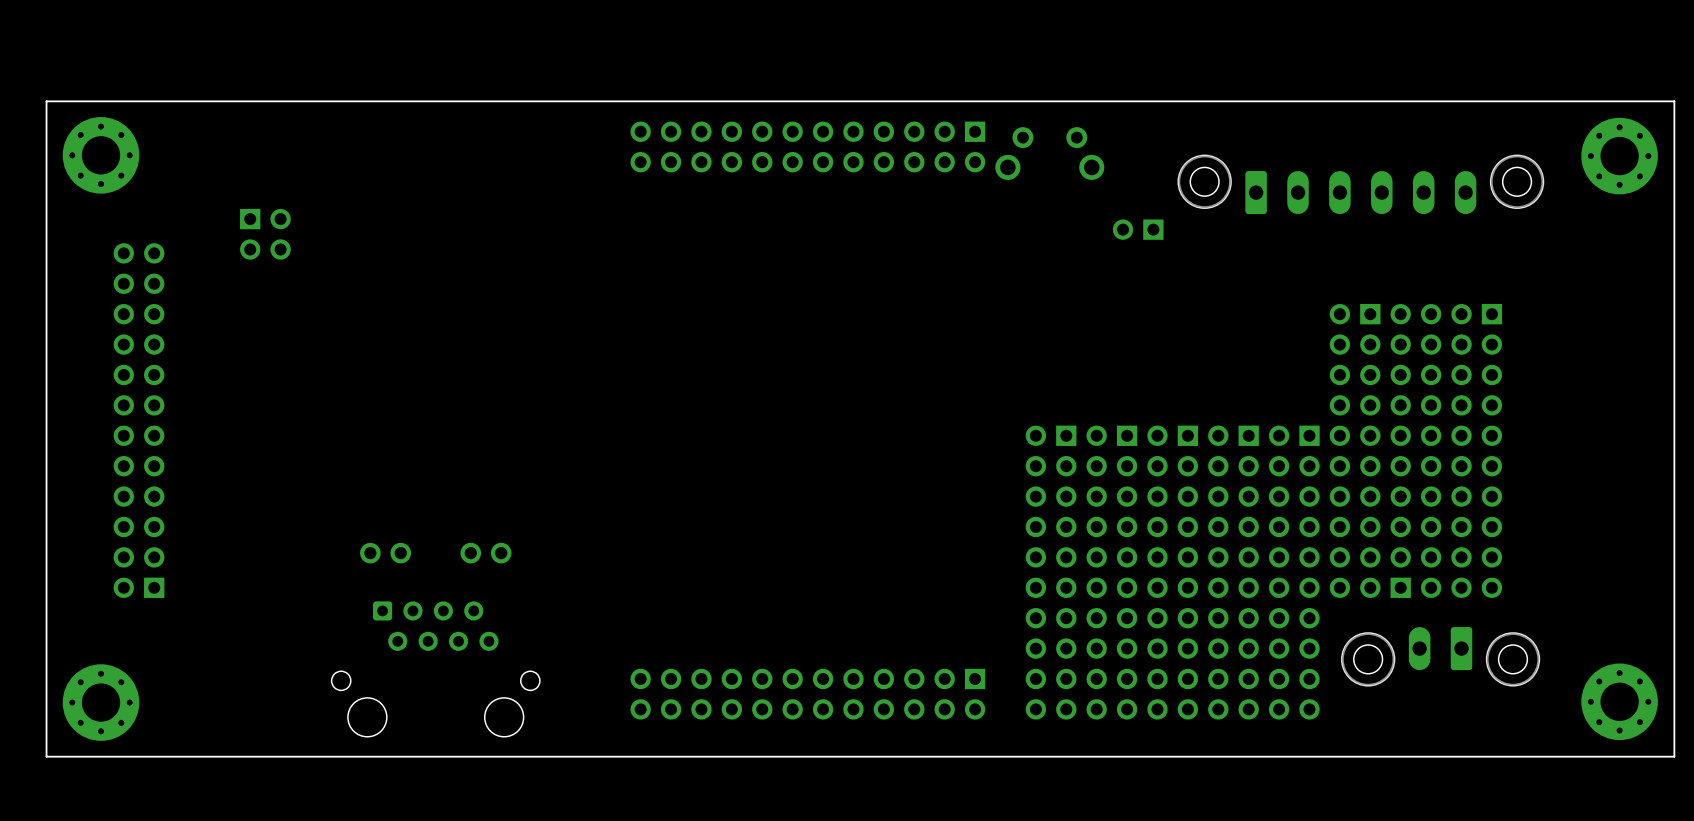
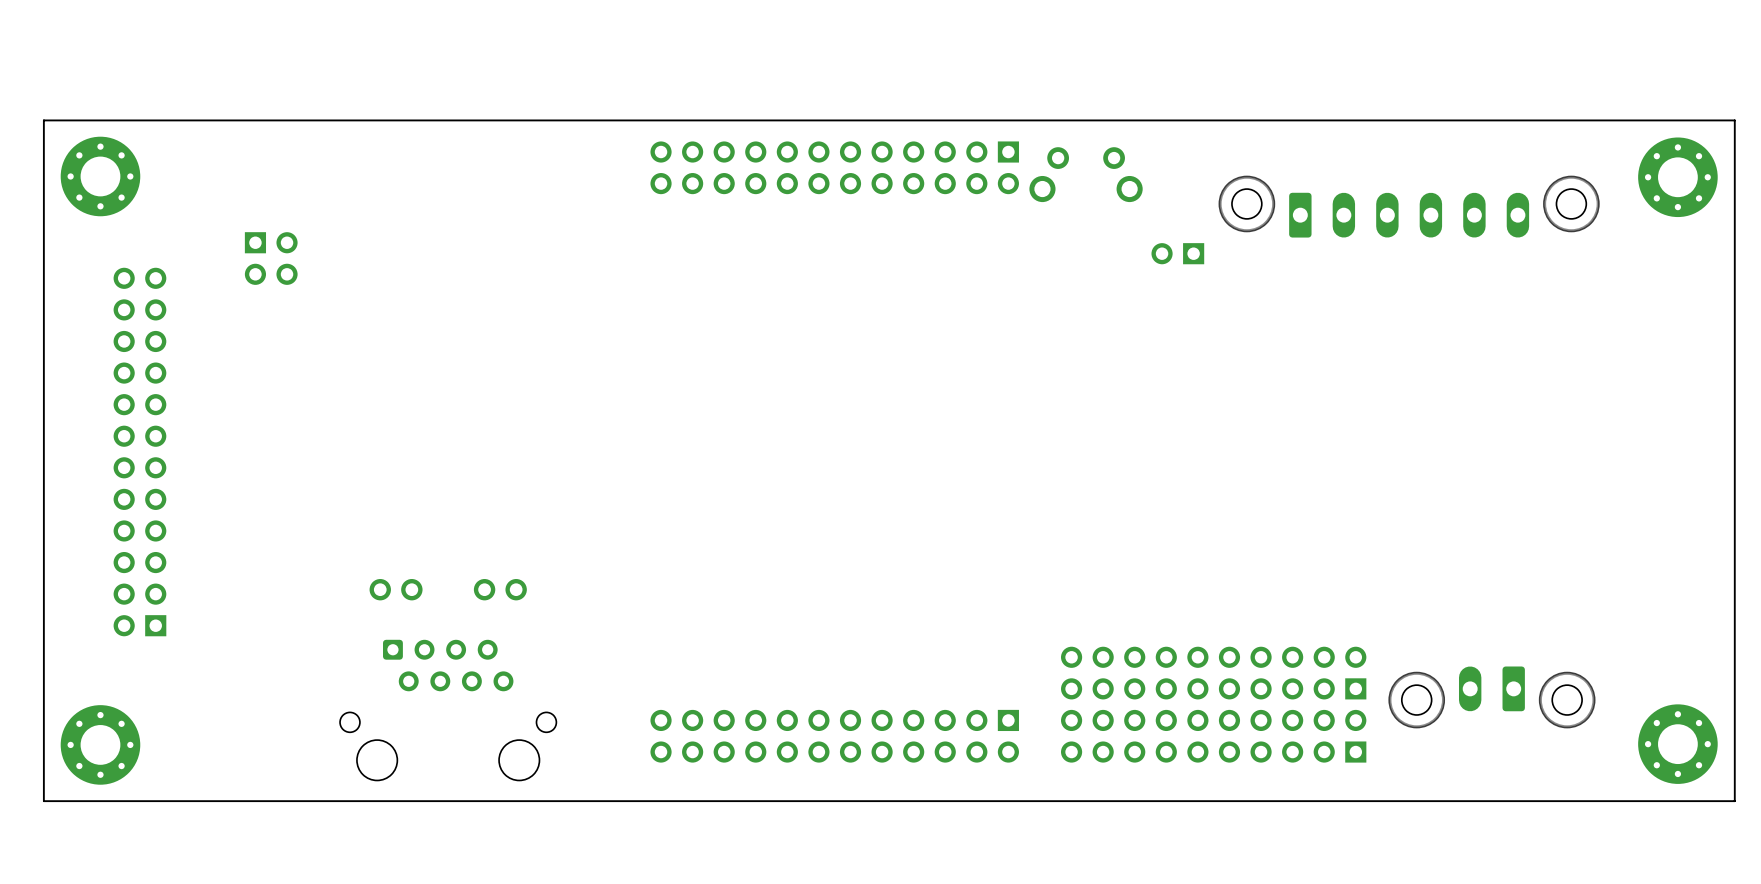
part: (1355, 450) -> none
part: (1415, 450) -> none
part: (1476, 450) -> none
part: (1051, 572) -> none
part: (1111, 572) -> none
part: (1172, 572) -> none
part: (1233, 572) -> none
part: (1294, 572) -> none
part: none -> (1213, 673)
part: none -> (1213, 736)

